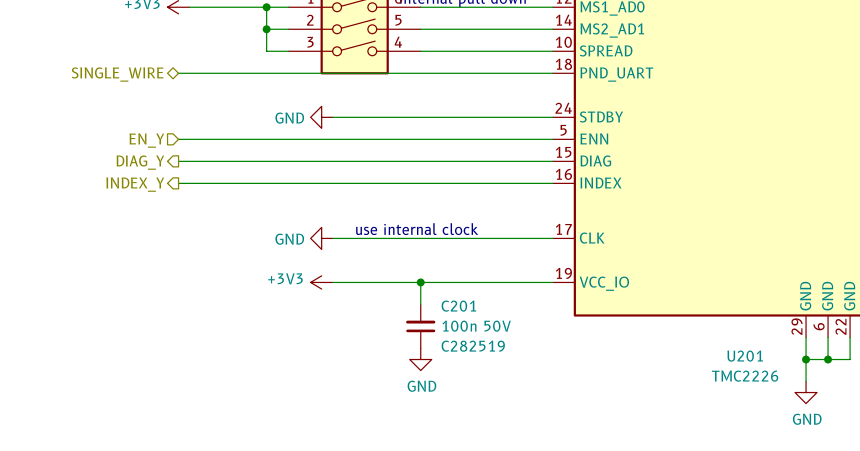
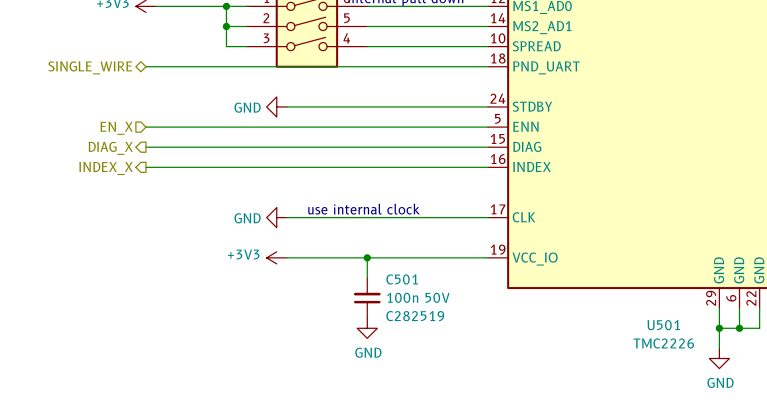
hierarchical label: EN_Y (146, 140) -> EN_X (116, 128)
hierarchical label: DIAG_Y (140, 162) -> DIAG_X (110, 148)
hierarchical label: INDEX_Y (135, 184) -> INDEX_X (106, 168)
C201 name: C201 (458, 306) -> C501 (402, 279)
U201 name: U201 (745, 356) -> U501 (663, 325)

